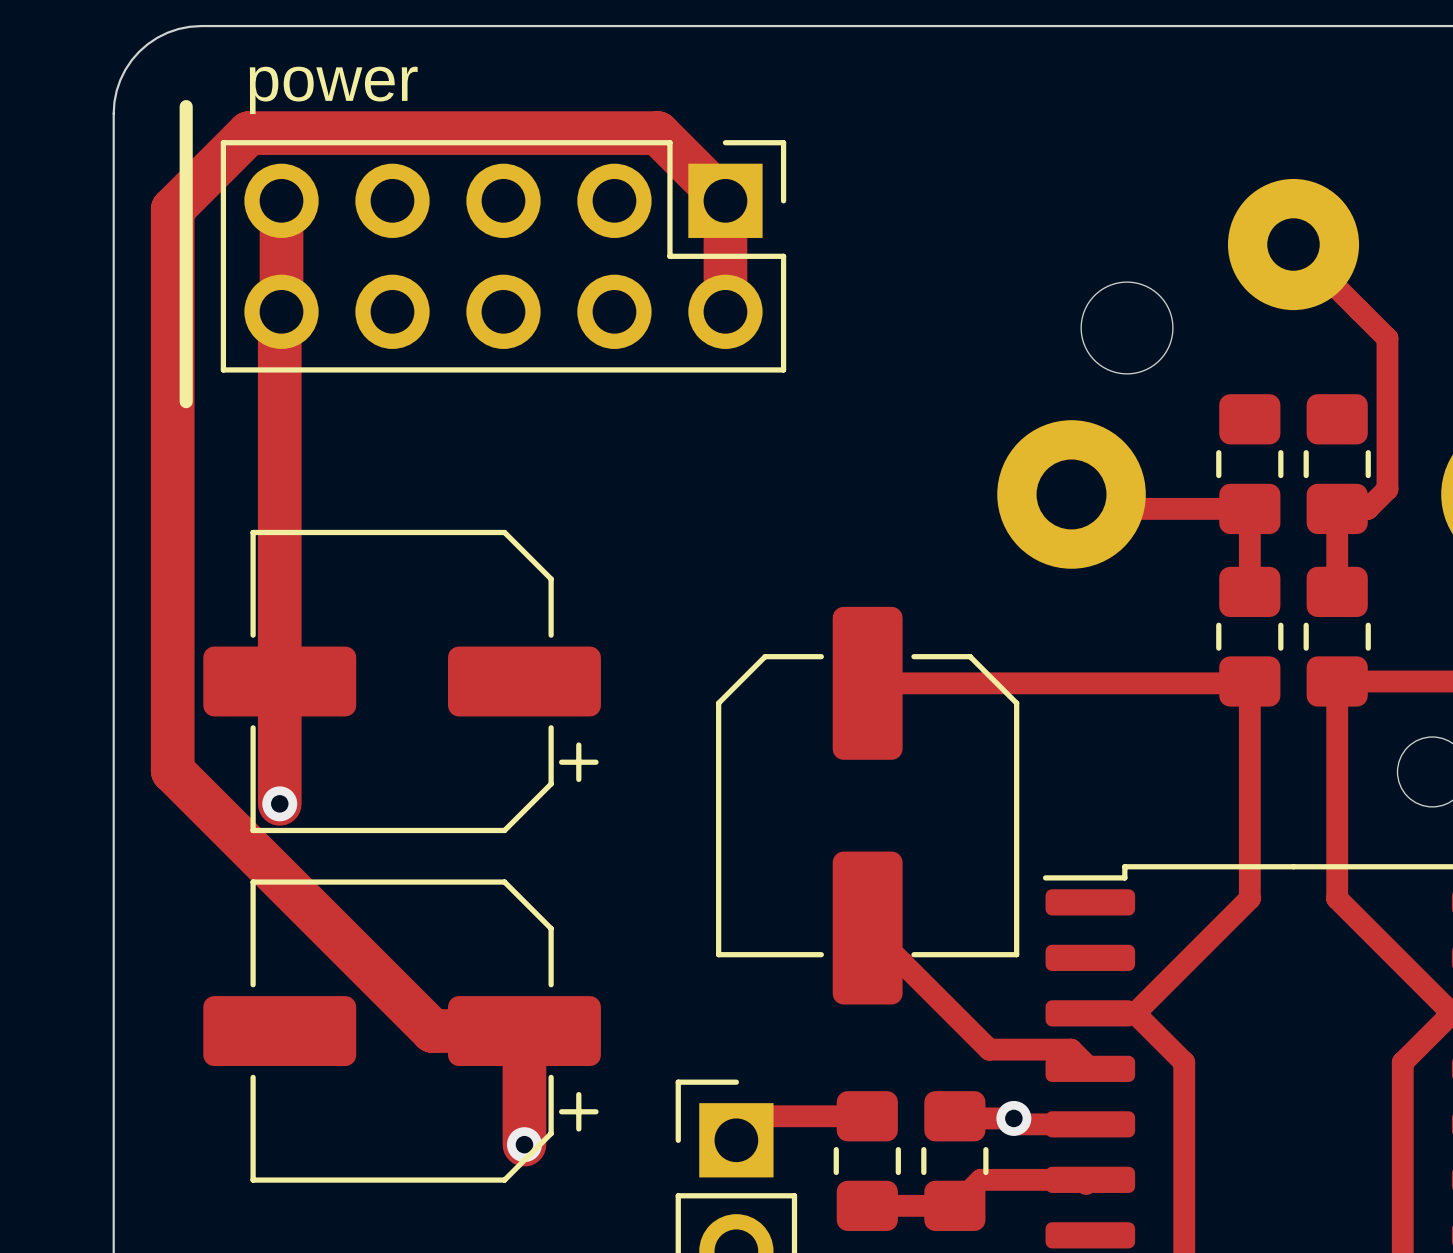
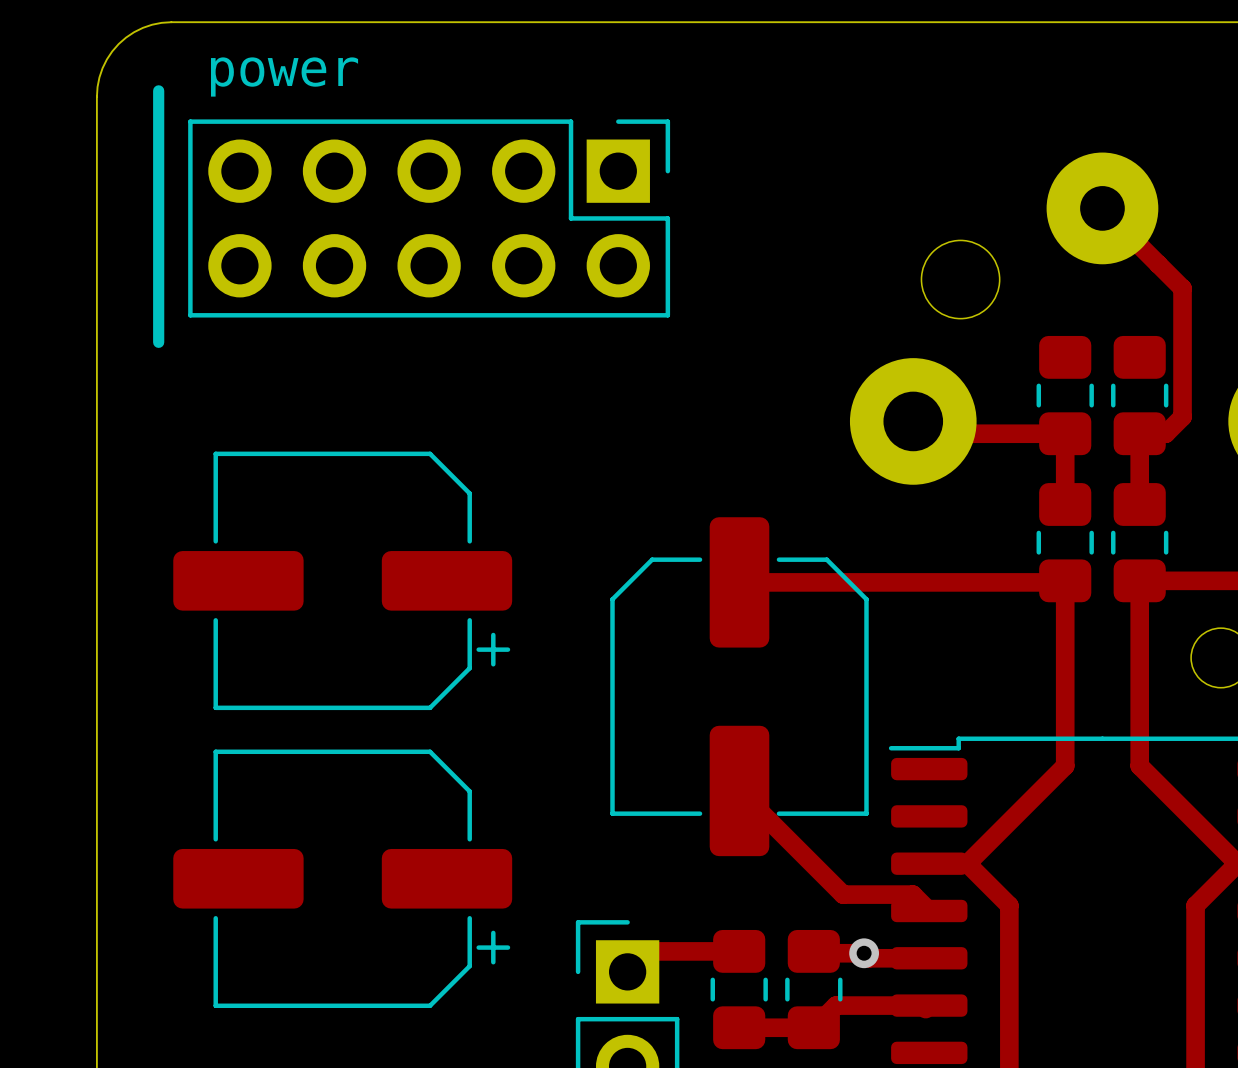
track: (281, 200) (279, 803) -> none
track: (725, 311) (725, 200) (657, 133) (249, 133) (172, 209) (172, 770) (432, 1031) (524, 1031) (524, 1144) -> none
via: (279, 803) -> none
via: (524, 1144) -> none

